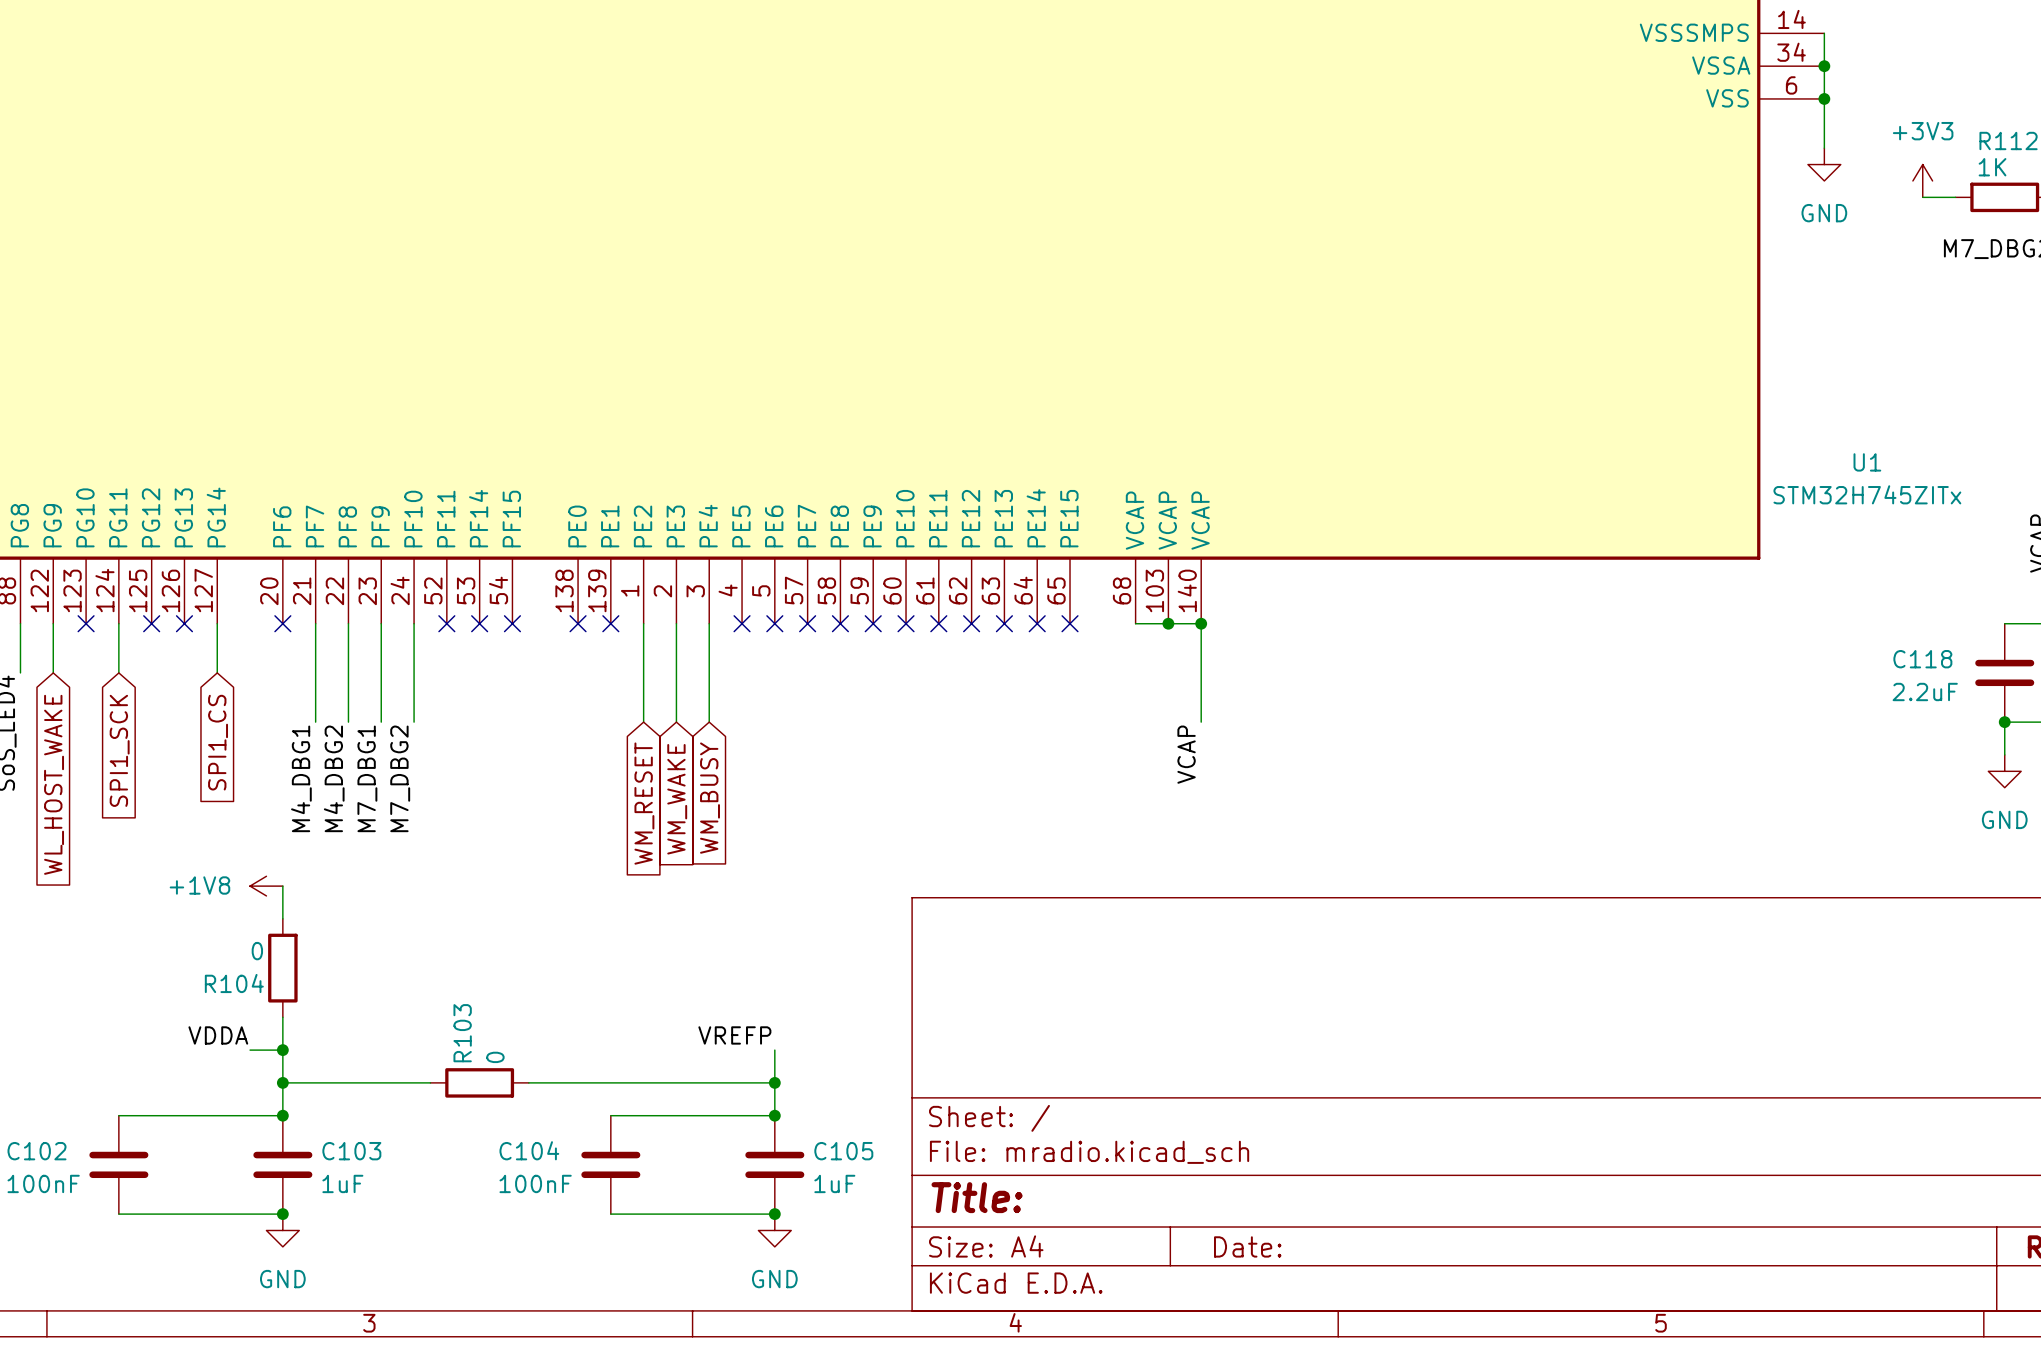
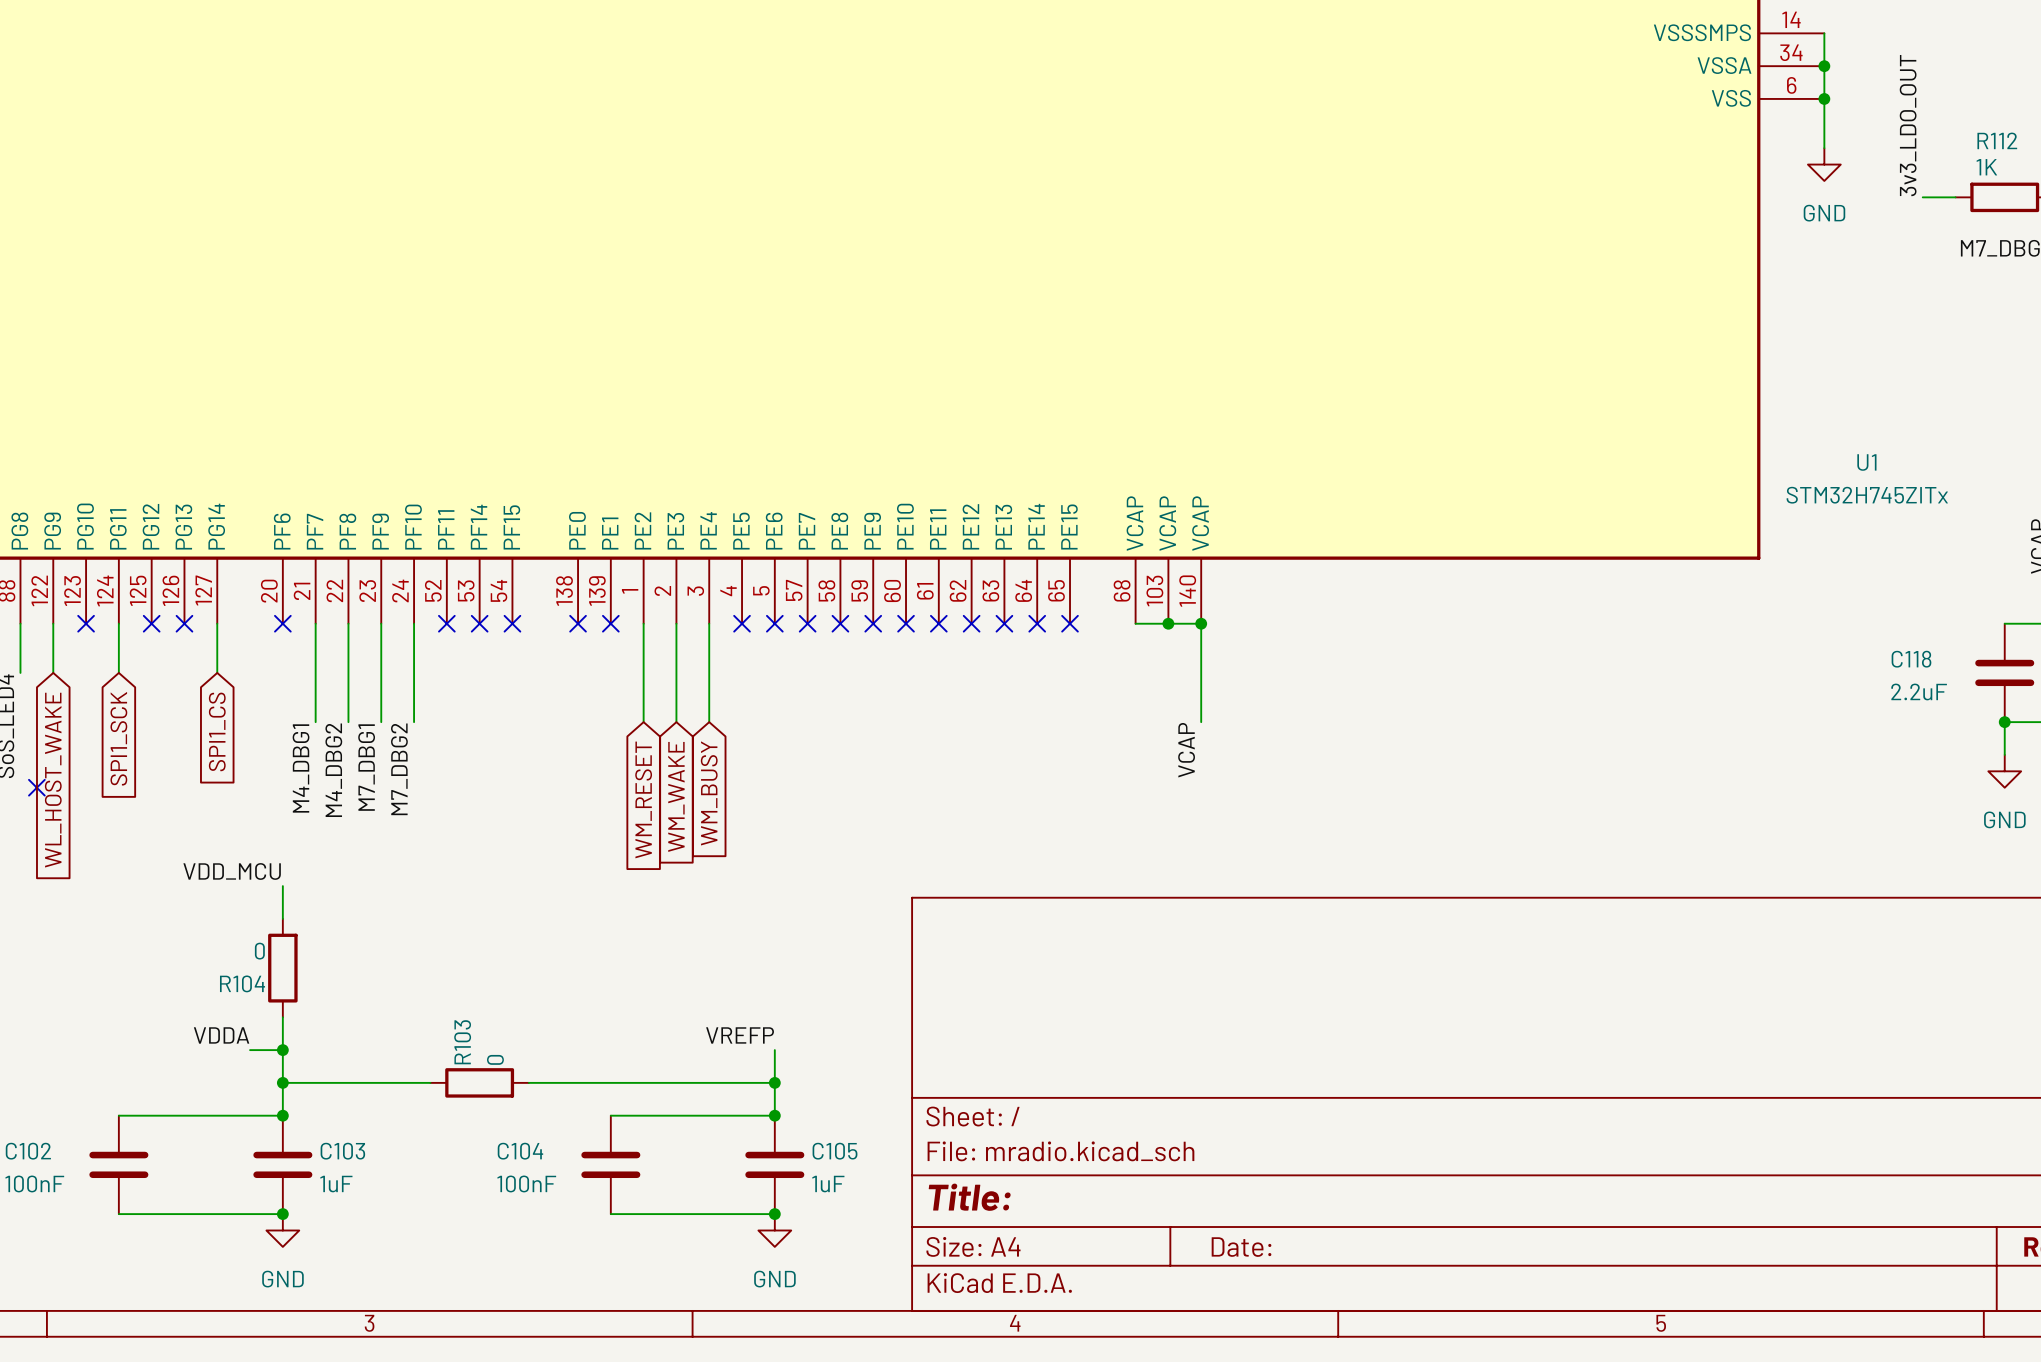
label: none -> 3v3_LDO_OUT (1908, 125)
power symbol: +3V3 (1922, 180) -> none
no-connect mark: none -> (36, 787)
label: none -> VDD_MCU (232, 871)
power symbol: +1V8 (266, 886) -> none

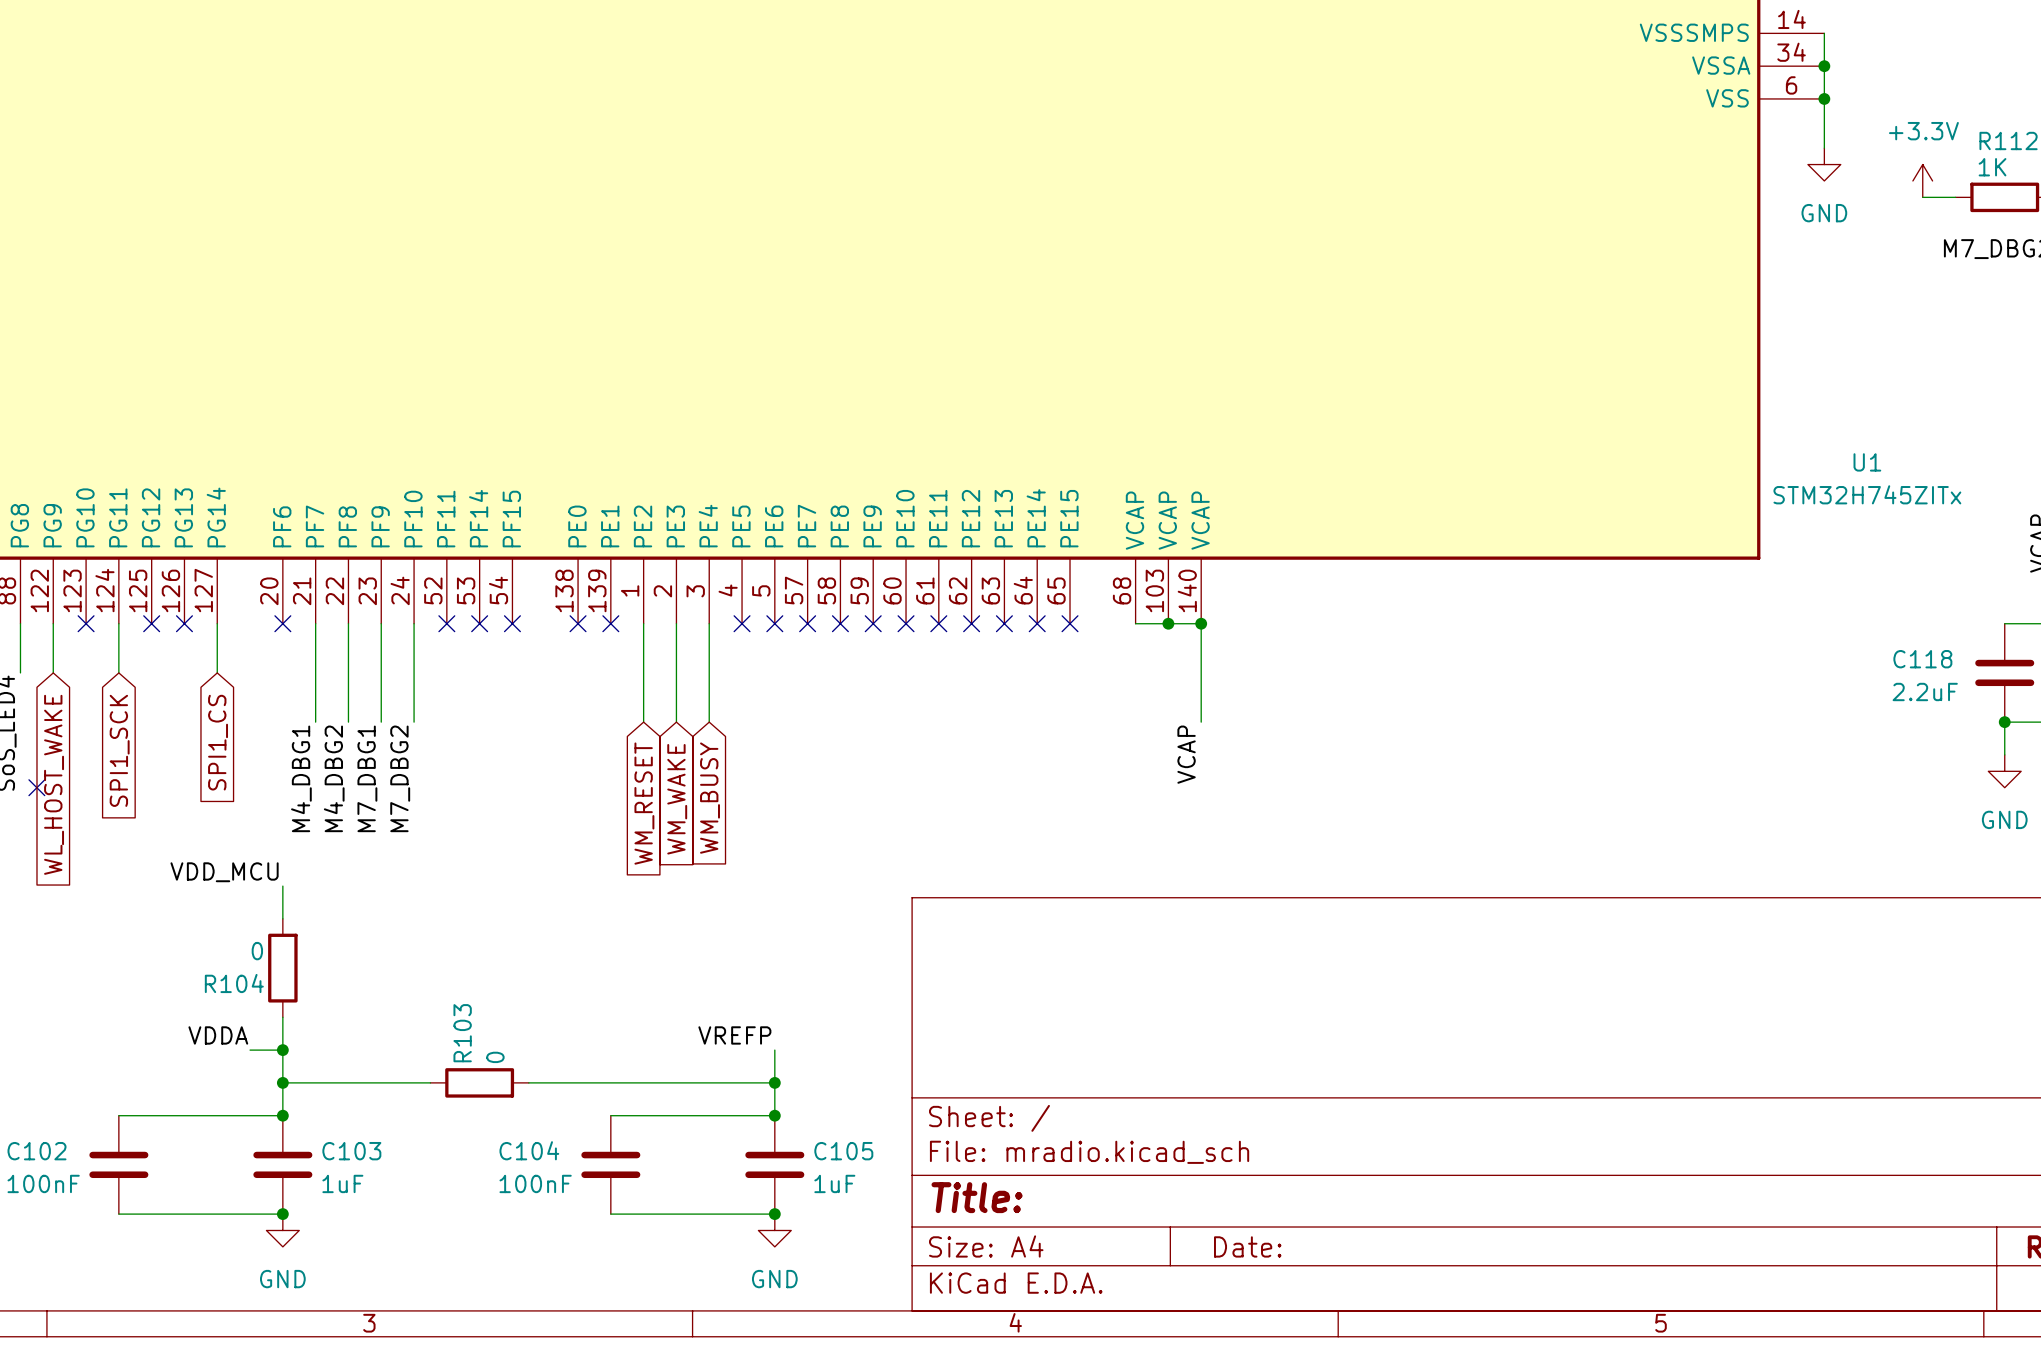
label: 3v3_LDO_OUT (1908, 125) -> none
power symbol: none -> +3.3V (1922, 180)

